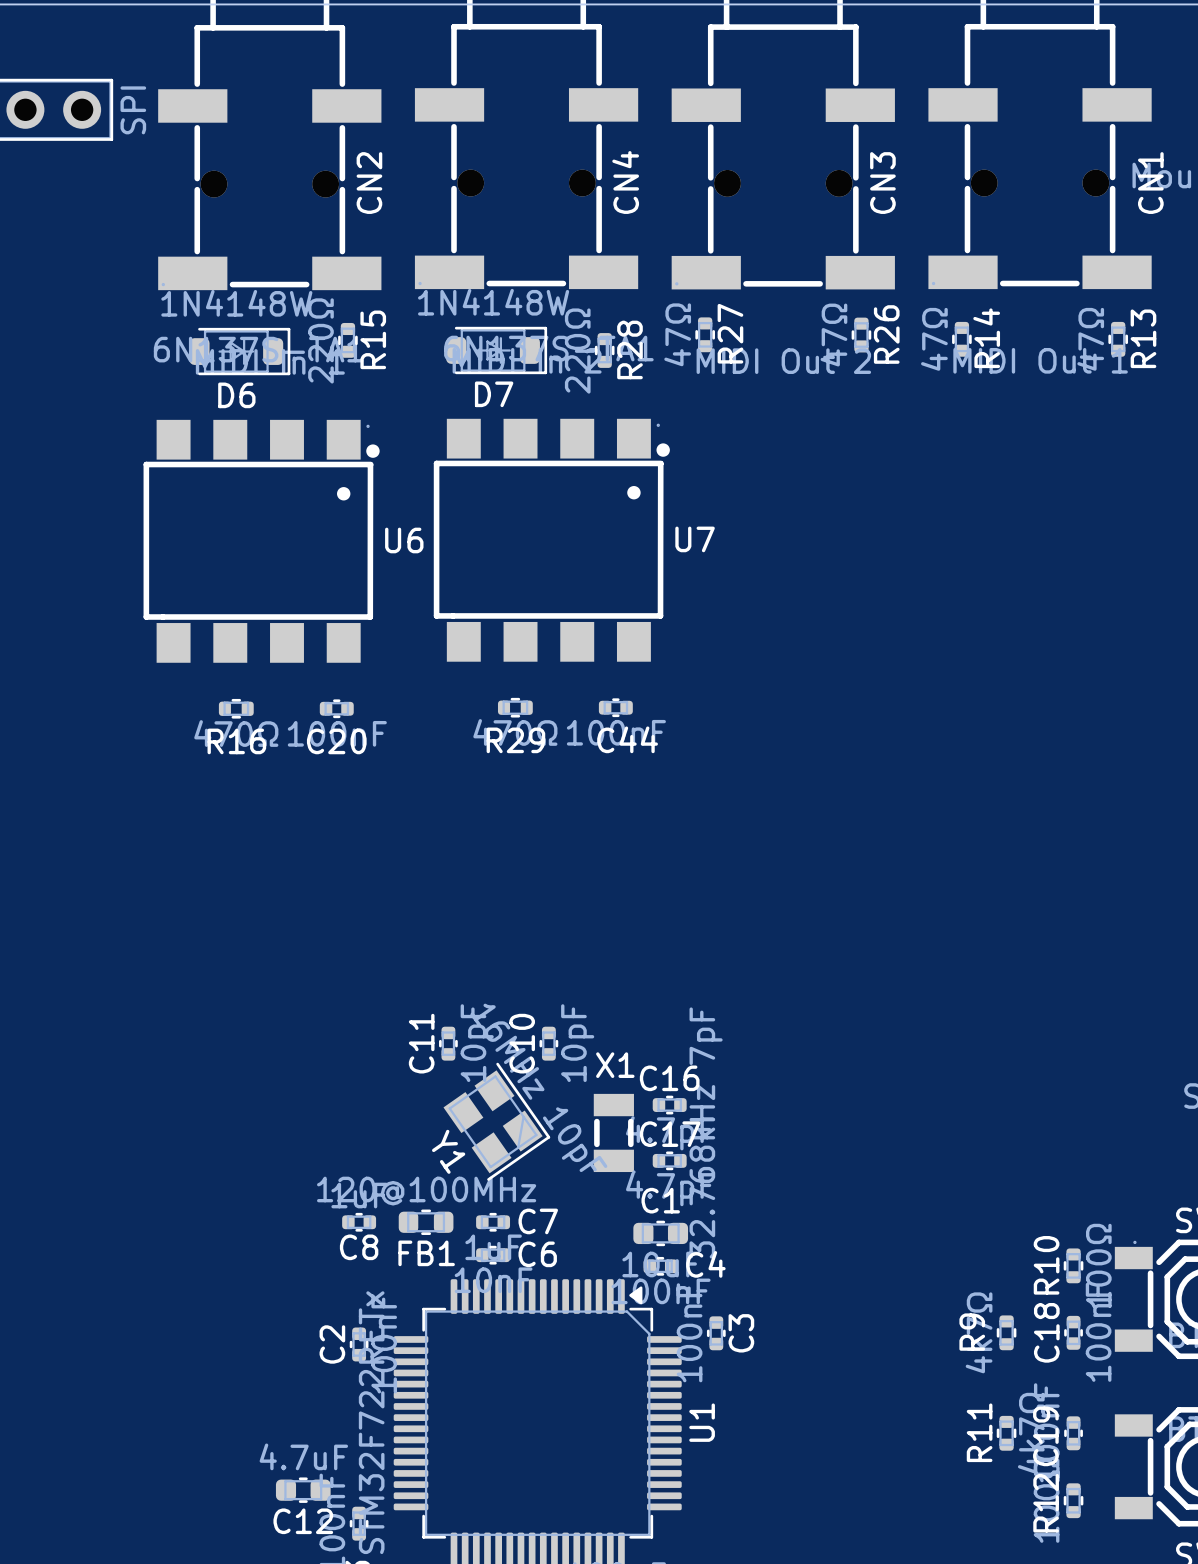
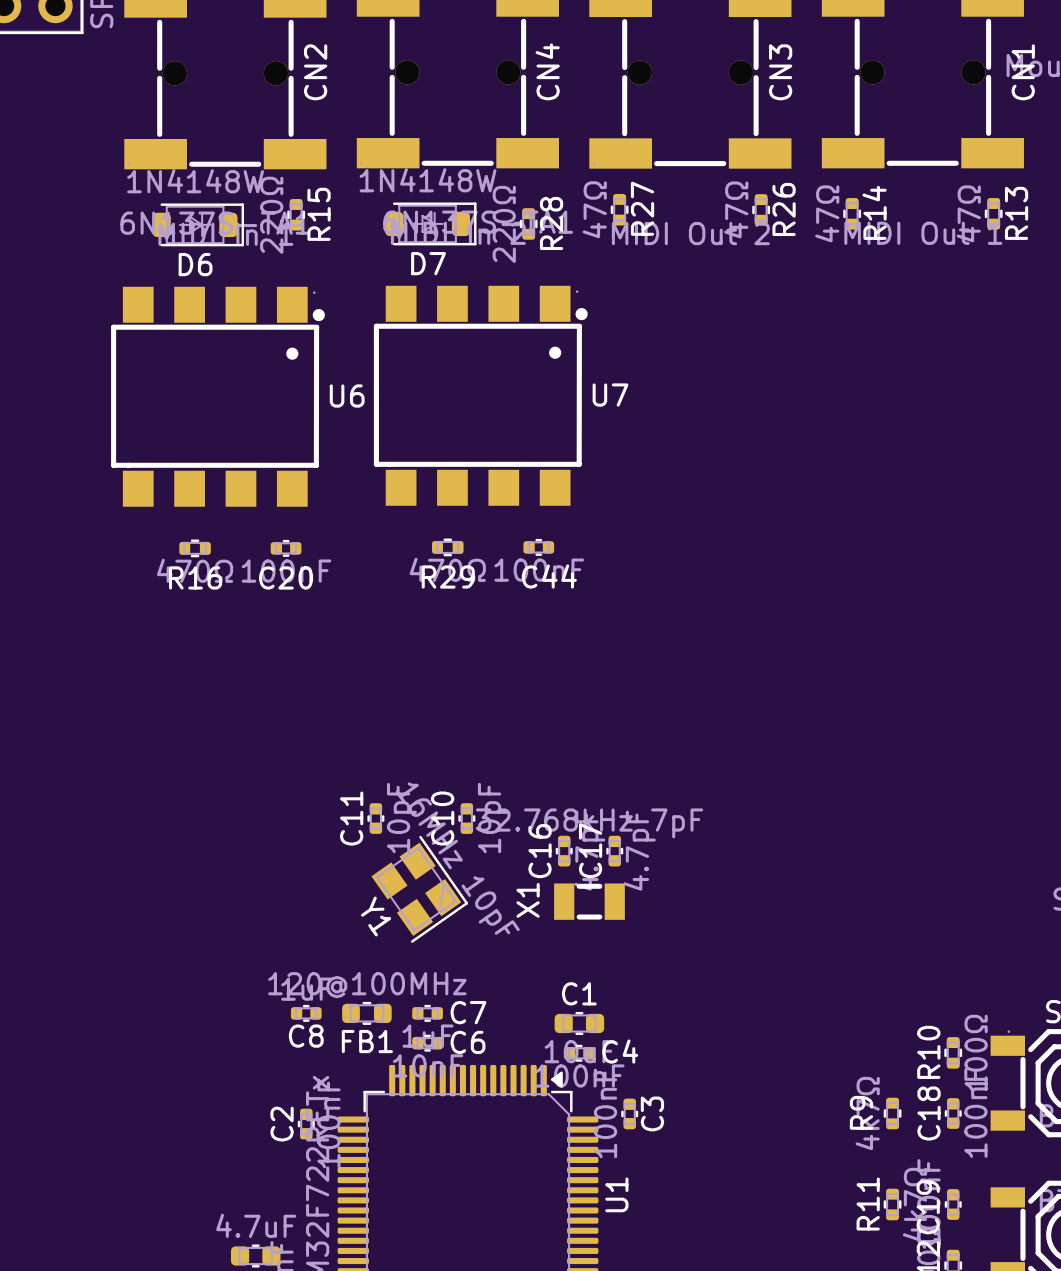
C11 position: (448, 1043) -> (375, 818)
C10 position: (548, 1043) -> (466, 818)
C16 rotation: 0° (669, 1105) -> 90° clockwise (564, 851)
C16 position: (669, 1105) -> (564, 851)
Y1 position: (496, 1121) -> (419, 889)
X1 rotation: 0° (614, 1133) -> 90° counterclockwise (590, 901)
X1 position: (614, 1133) -> (590, 901)
C17 rotation: 0° (669, 1160) -> 90° clockwise (614, 851)
C17 position: (669, 1160) -> (614, 851)

